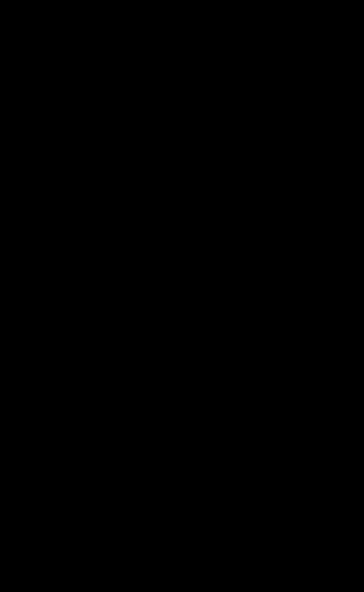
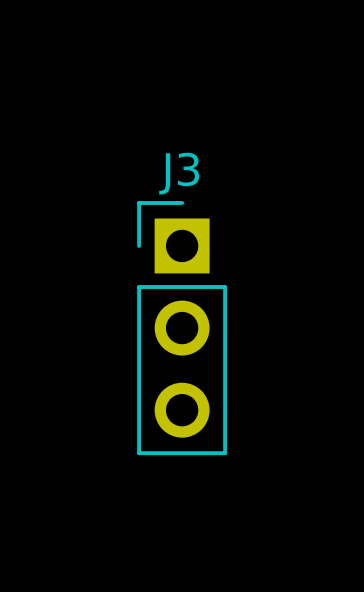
J3: none -> (182, 328)

